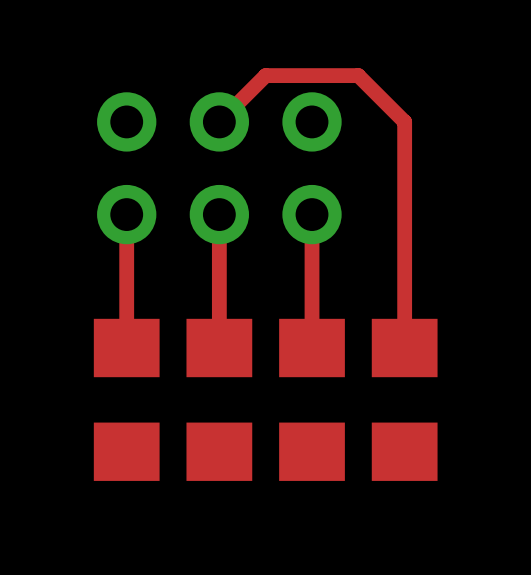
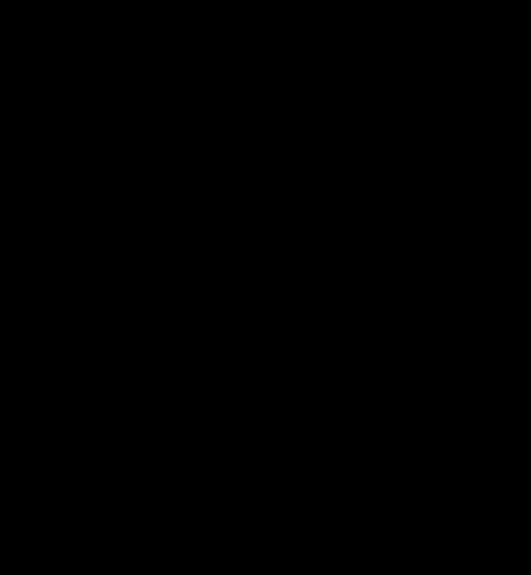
top track: (219, 121) (265, 75) (358, 75) (404, 121) (404, 348) -> none
part: (219, 168) -> none
top track: (126, 214) (126, 348) -> none
top track: (219, 214) (219, 348) -> none
top track: (312, 214) (312, 348) -> none
part: (126, 399) -> none
part: (219, 399) -> none
part: (312, 399) -> none
part: (404, 399) -> none

